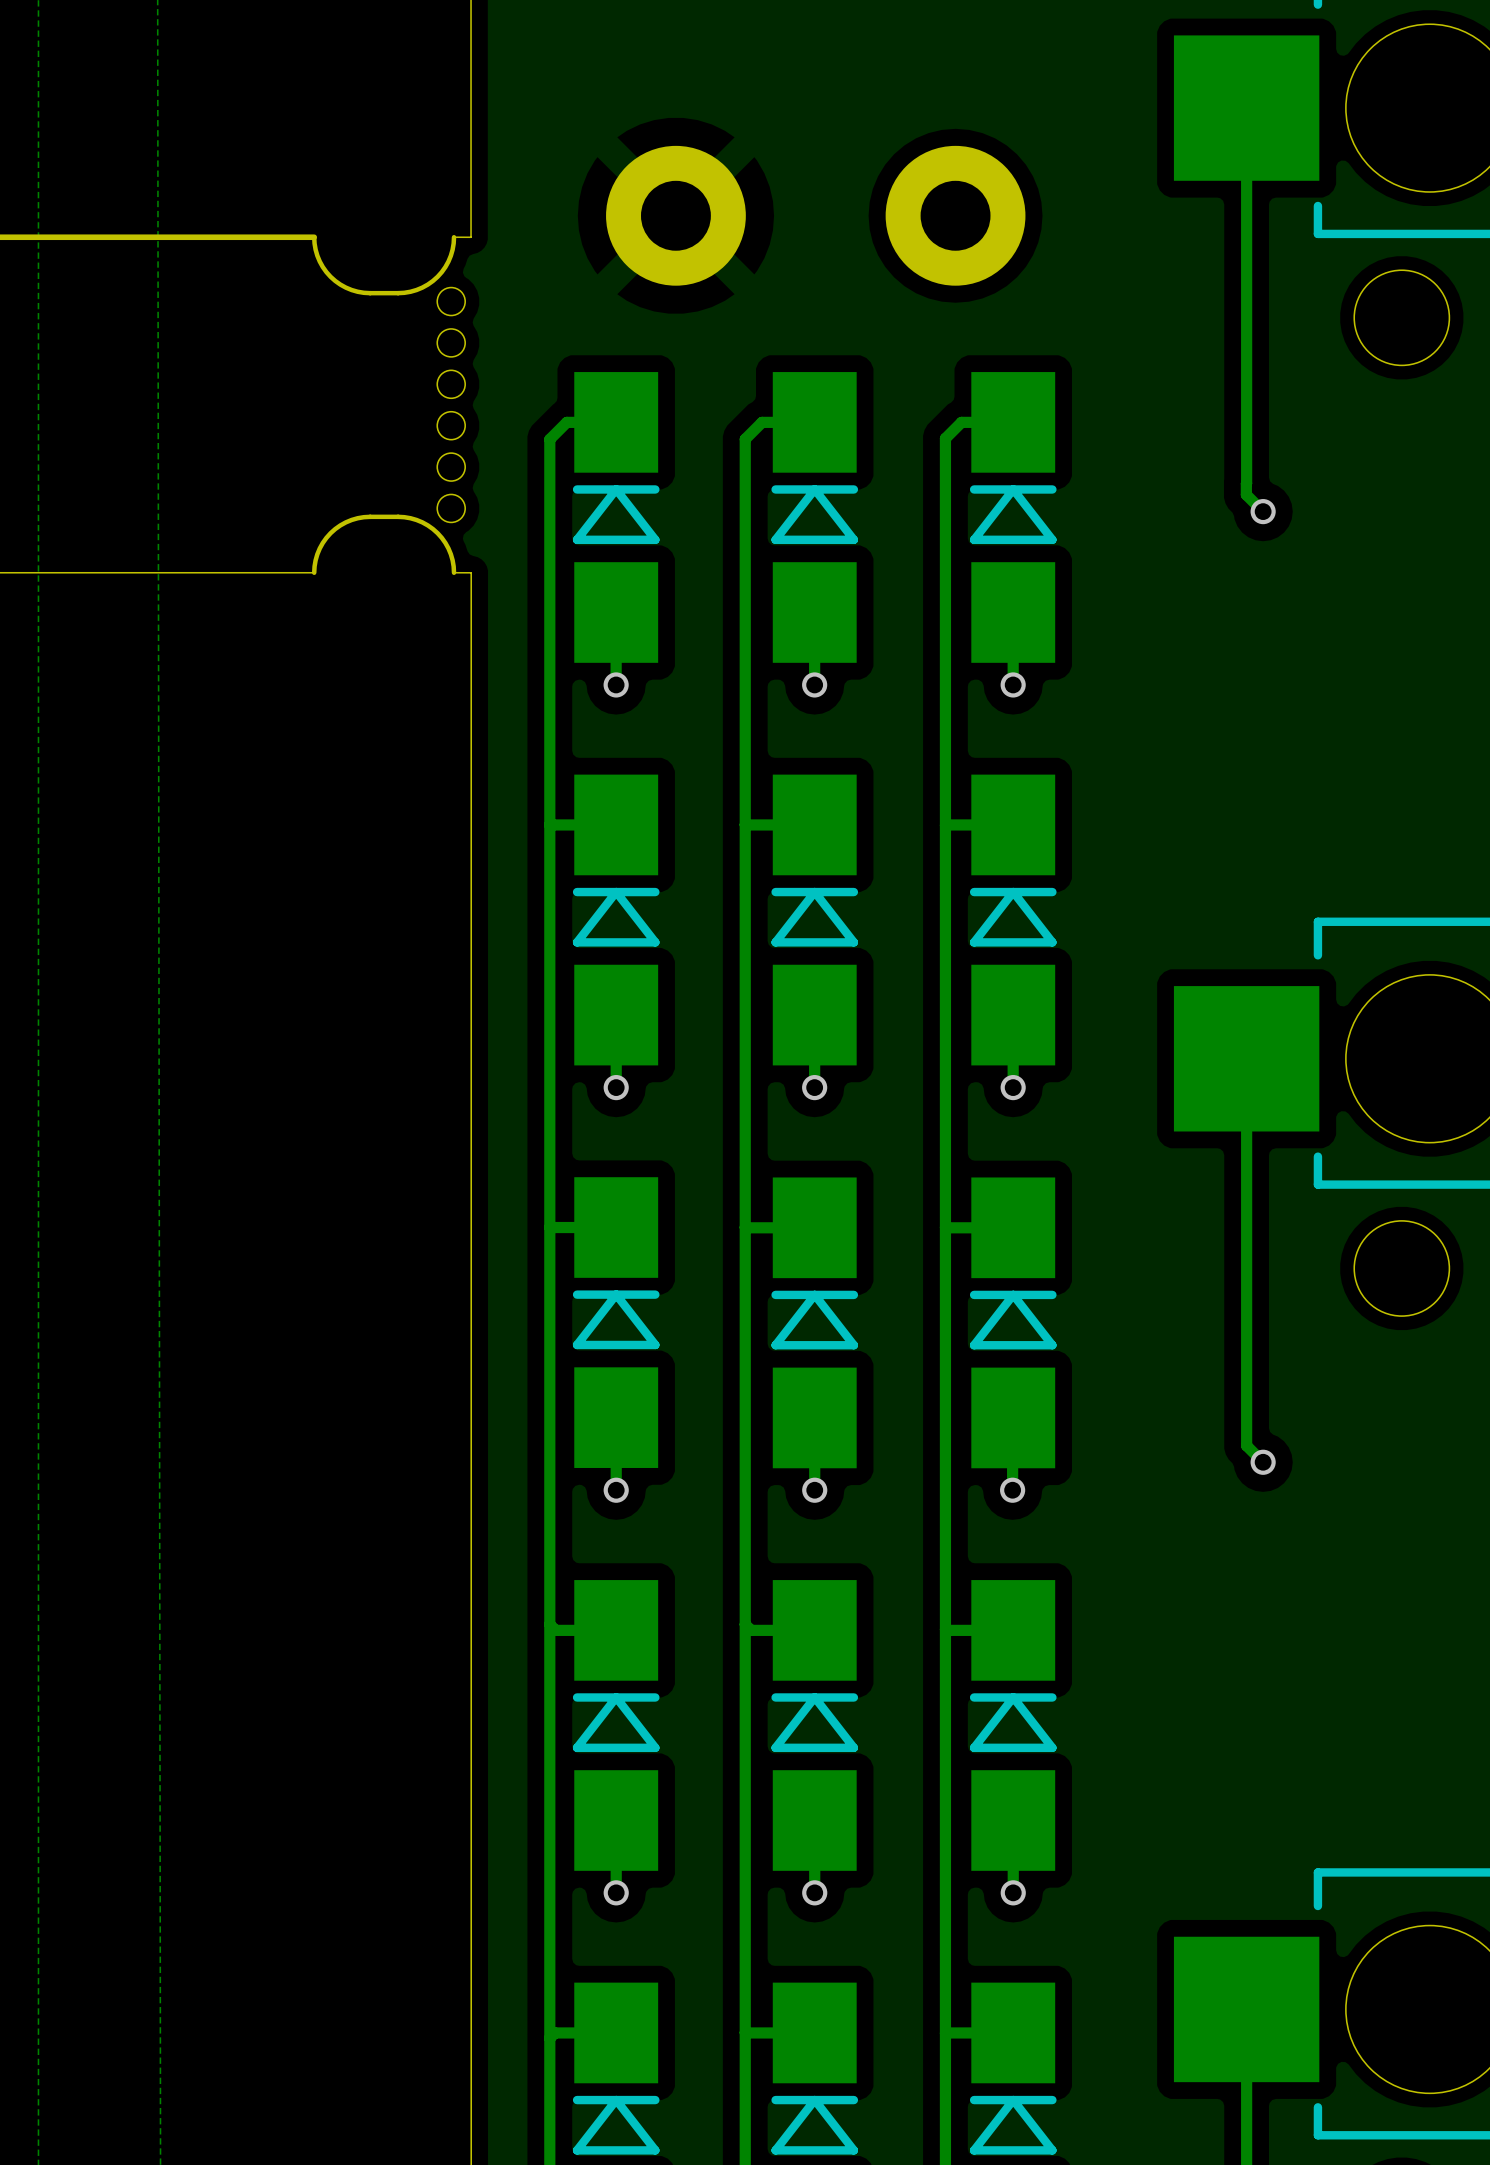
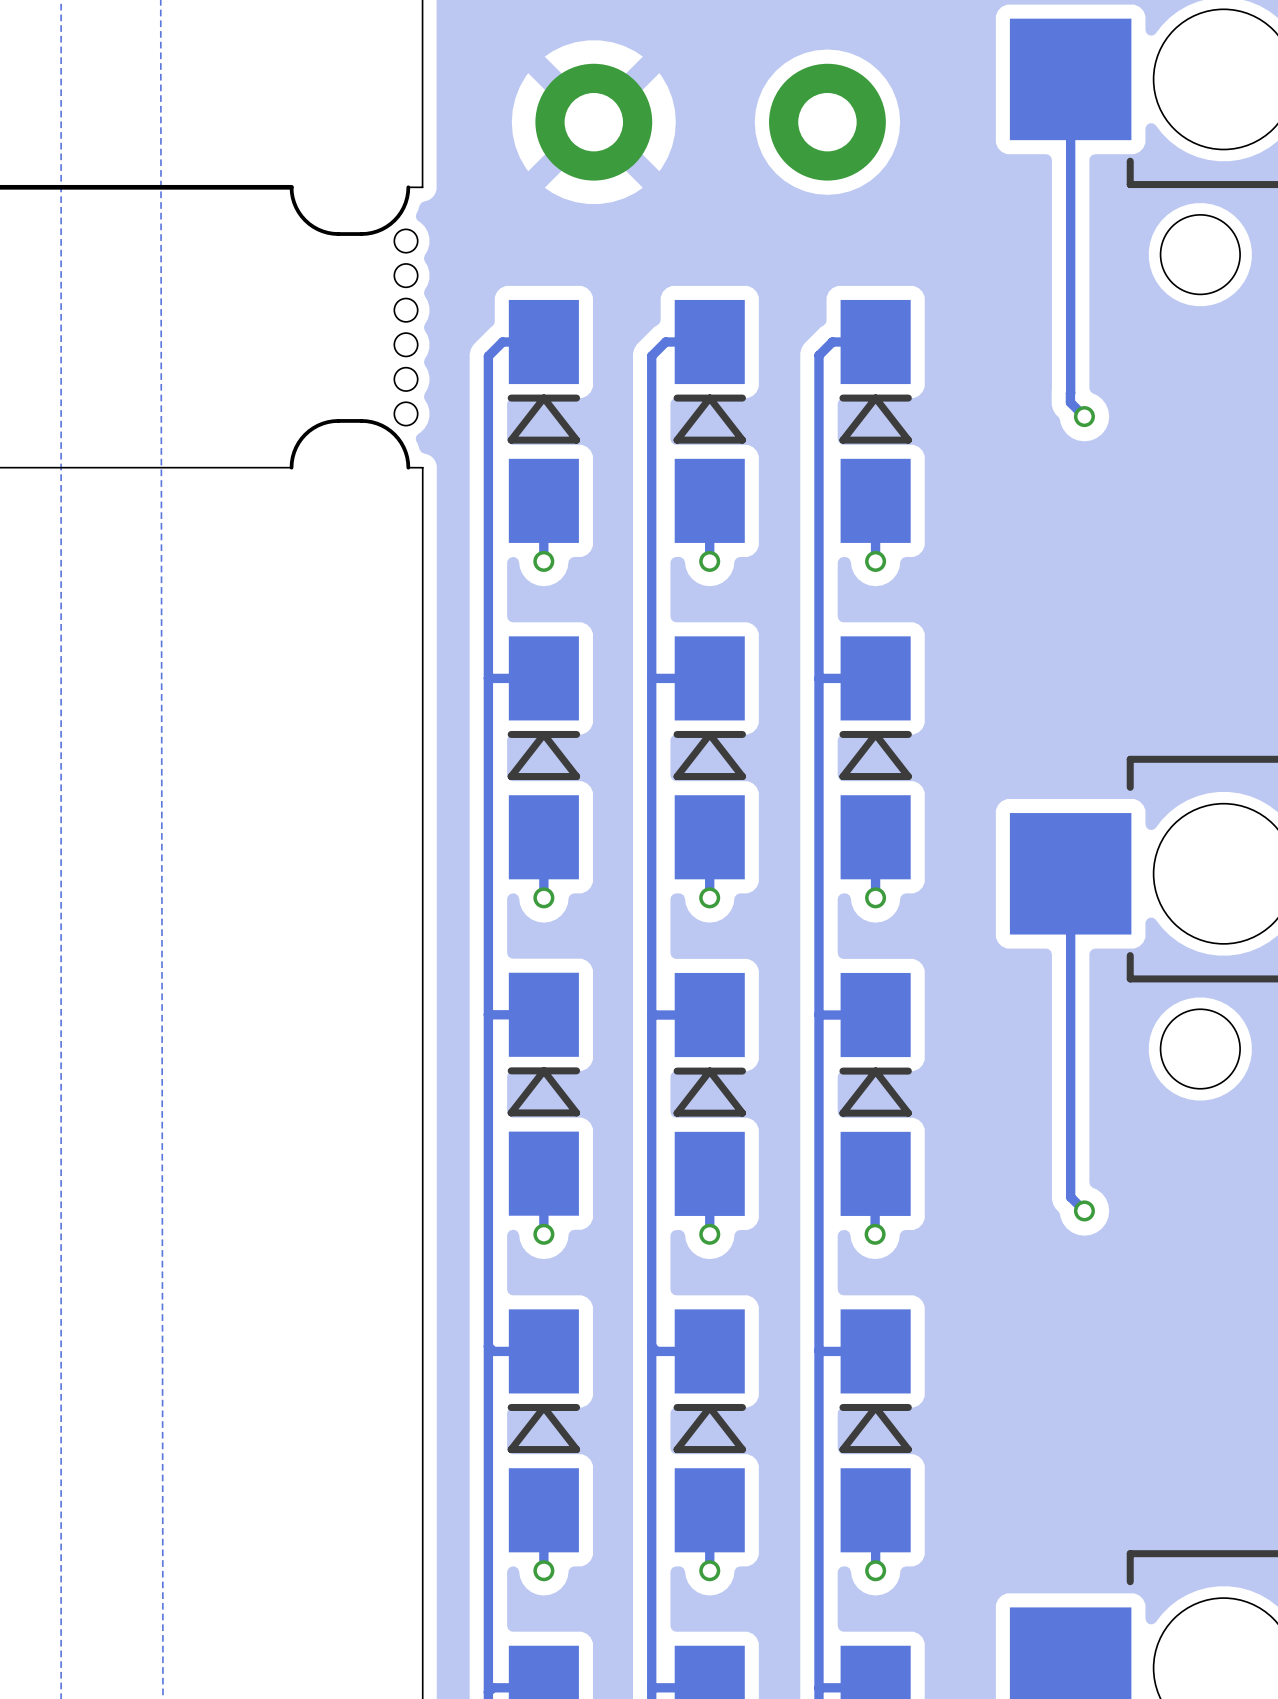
part position: (675, 215) -> (593, 122)
part position: (955, 215) -> (827, 122)

